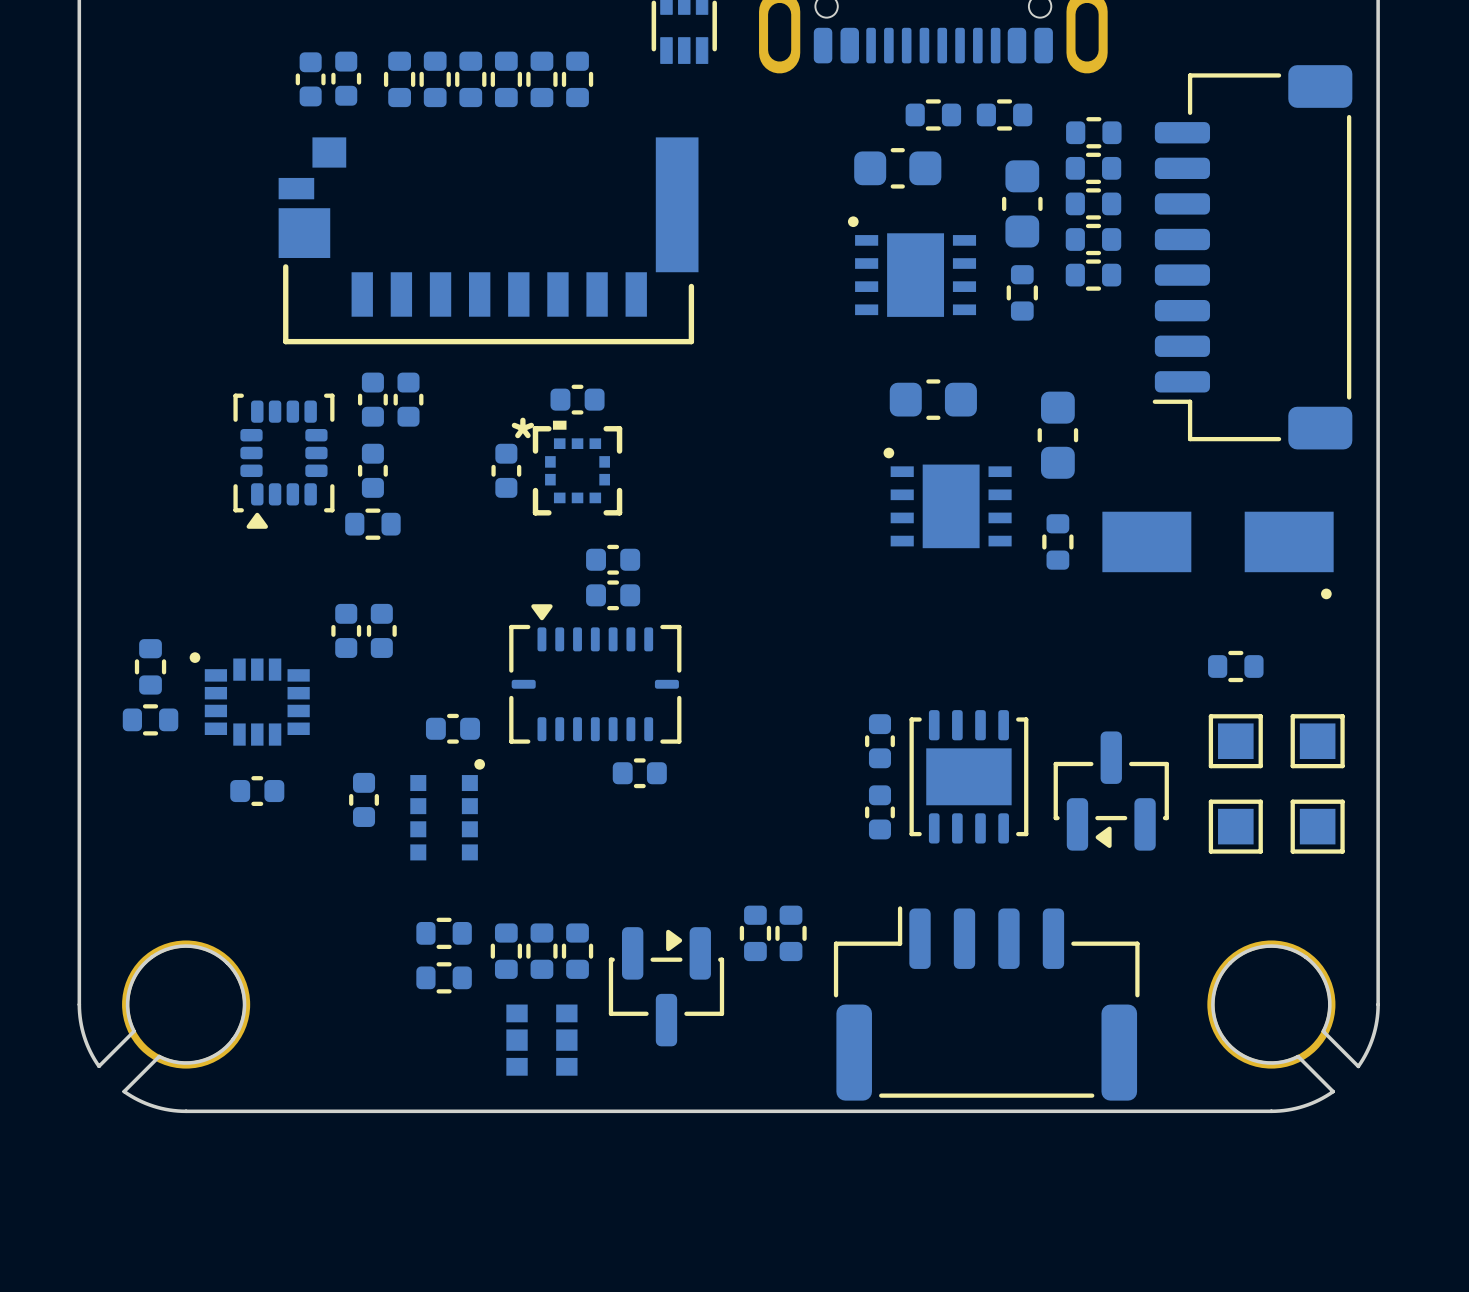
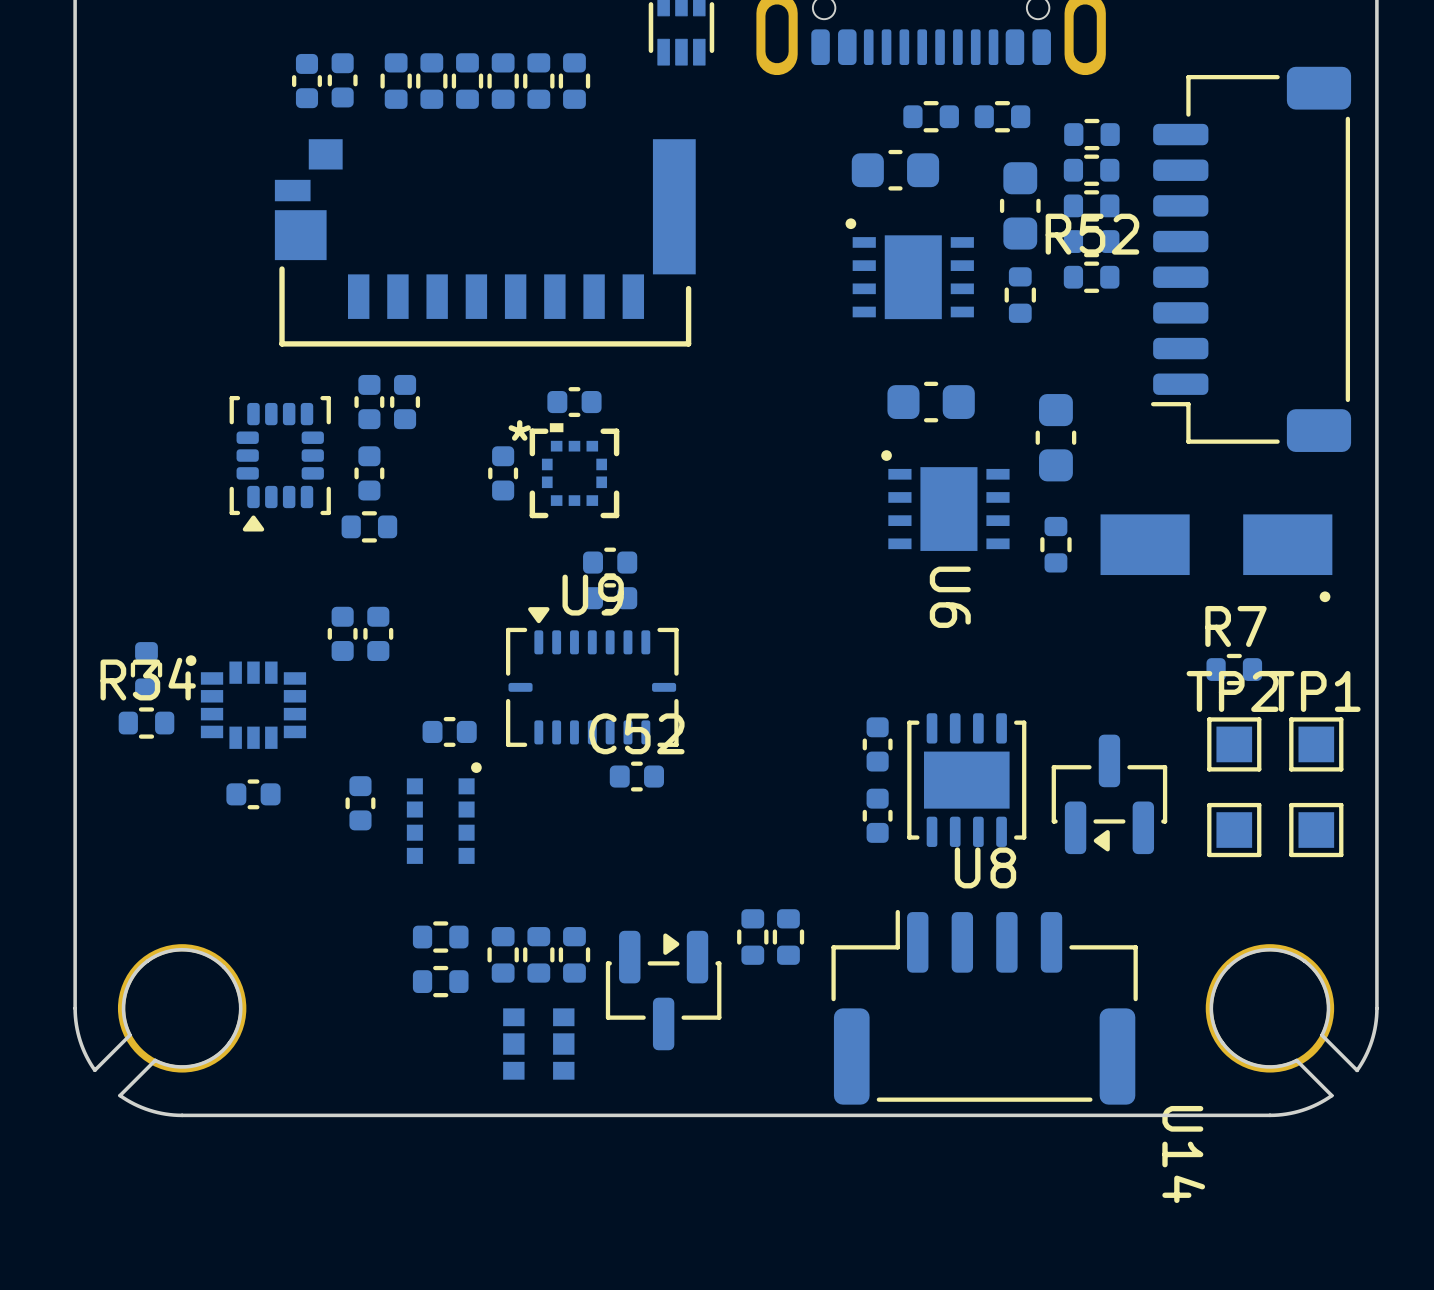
R52 name: none -> R52 (1092, 234)
U9 name: none -> U9 (593, 595)
U6 name: none -> U6 (950, 597)
R7 name: none -> R7 (1235, 626)
R34 name: none -> R34 (148, 679)
TP2 name: none -> TP2 (1232, 691)
TP1 name: none -> TP1 (1314, 691)
C52 name: none -> C52 (636, 733)
U8 name: none -> U8 (985, 867)
U14 name: none -> U14 (1183, 1154)

